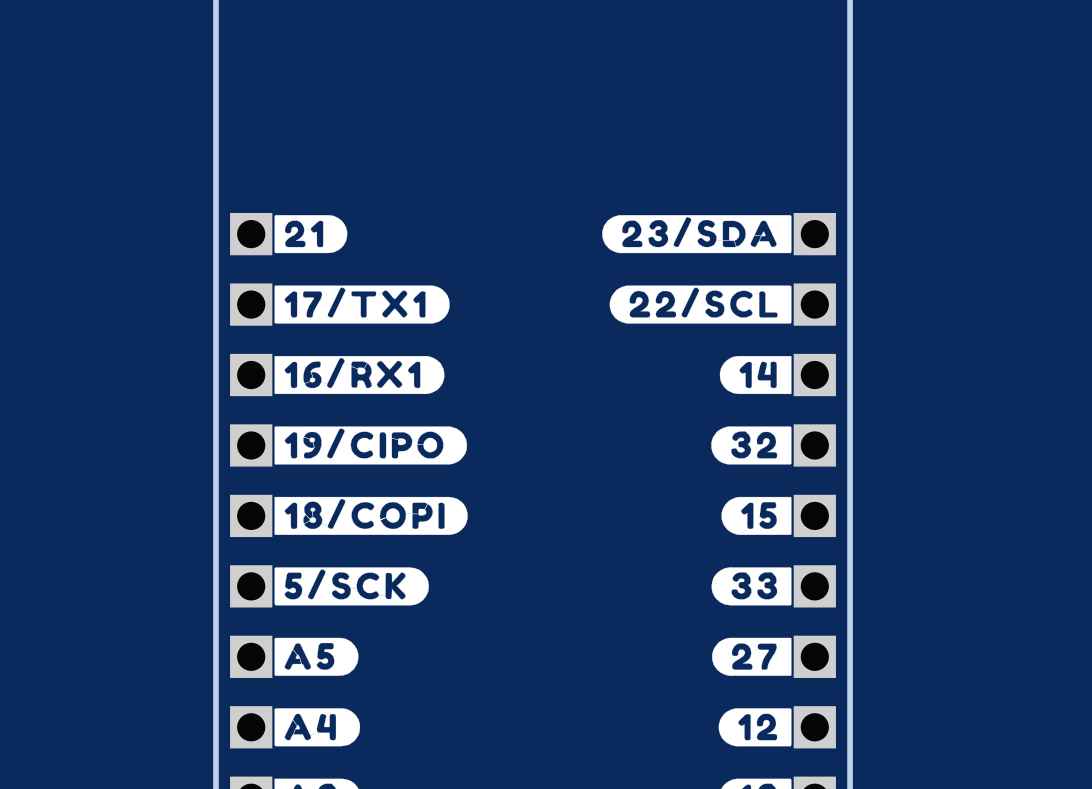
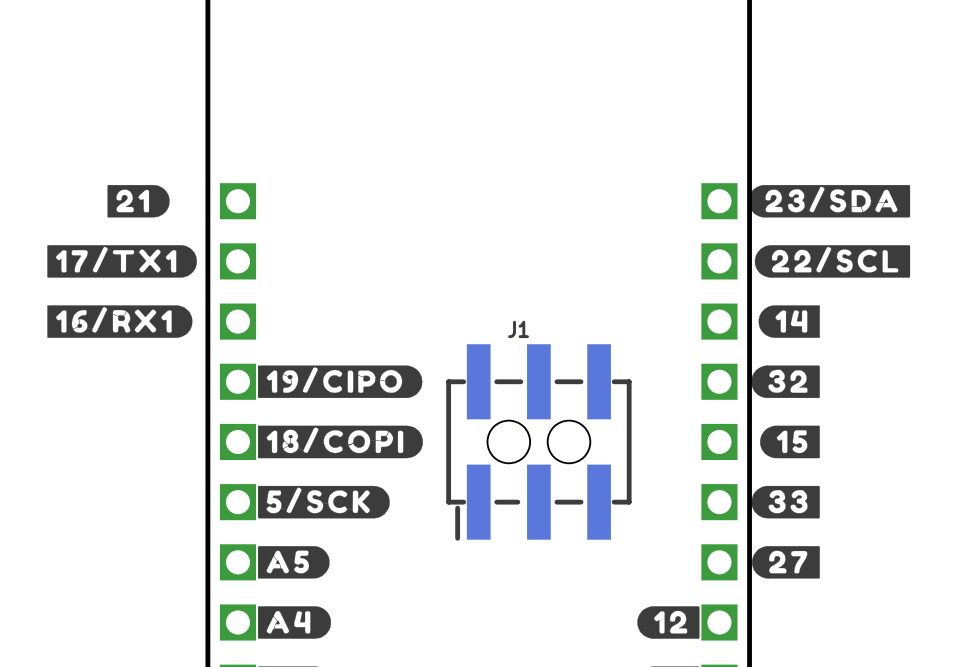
drawing position: (310, 234) -> (138, 201)
drawing position: (696, 234) -> (829, 201)
drawing position: (362, 304) -> (122, 261)
drawing position: (700, 304) -> (832, 261)
drawing position: (359, 375) -> (119, 321)
drawing position: (755, 375) -> (789, 321)
drawing position: (751, 445) -> (785, 381)
drawing position: (756, 515) -> (789, 441)
J1: none -> (538, 442)
drawing position: (751, 586) -> (785, 502)
drawing position: (751, 656) -> (785, 562)

